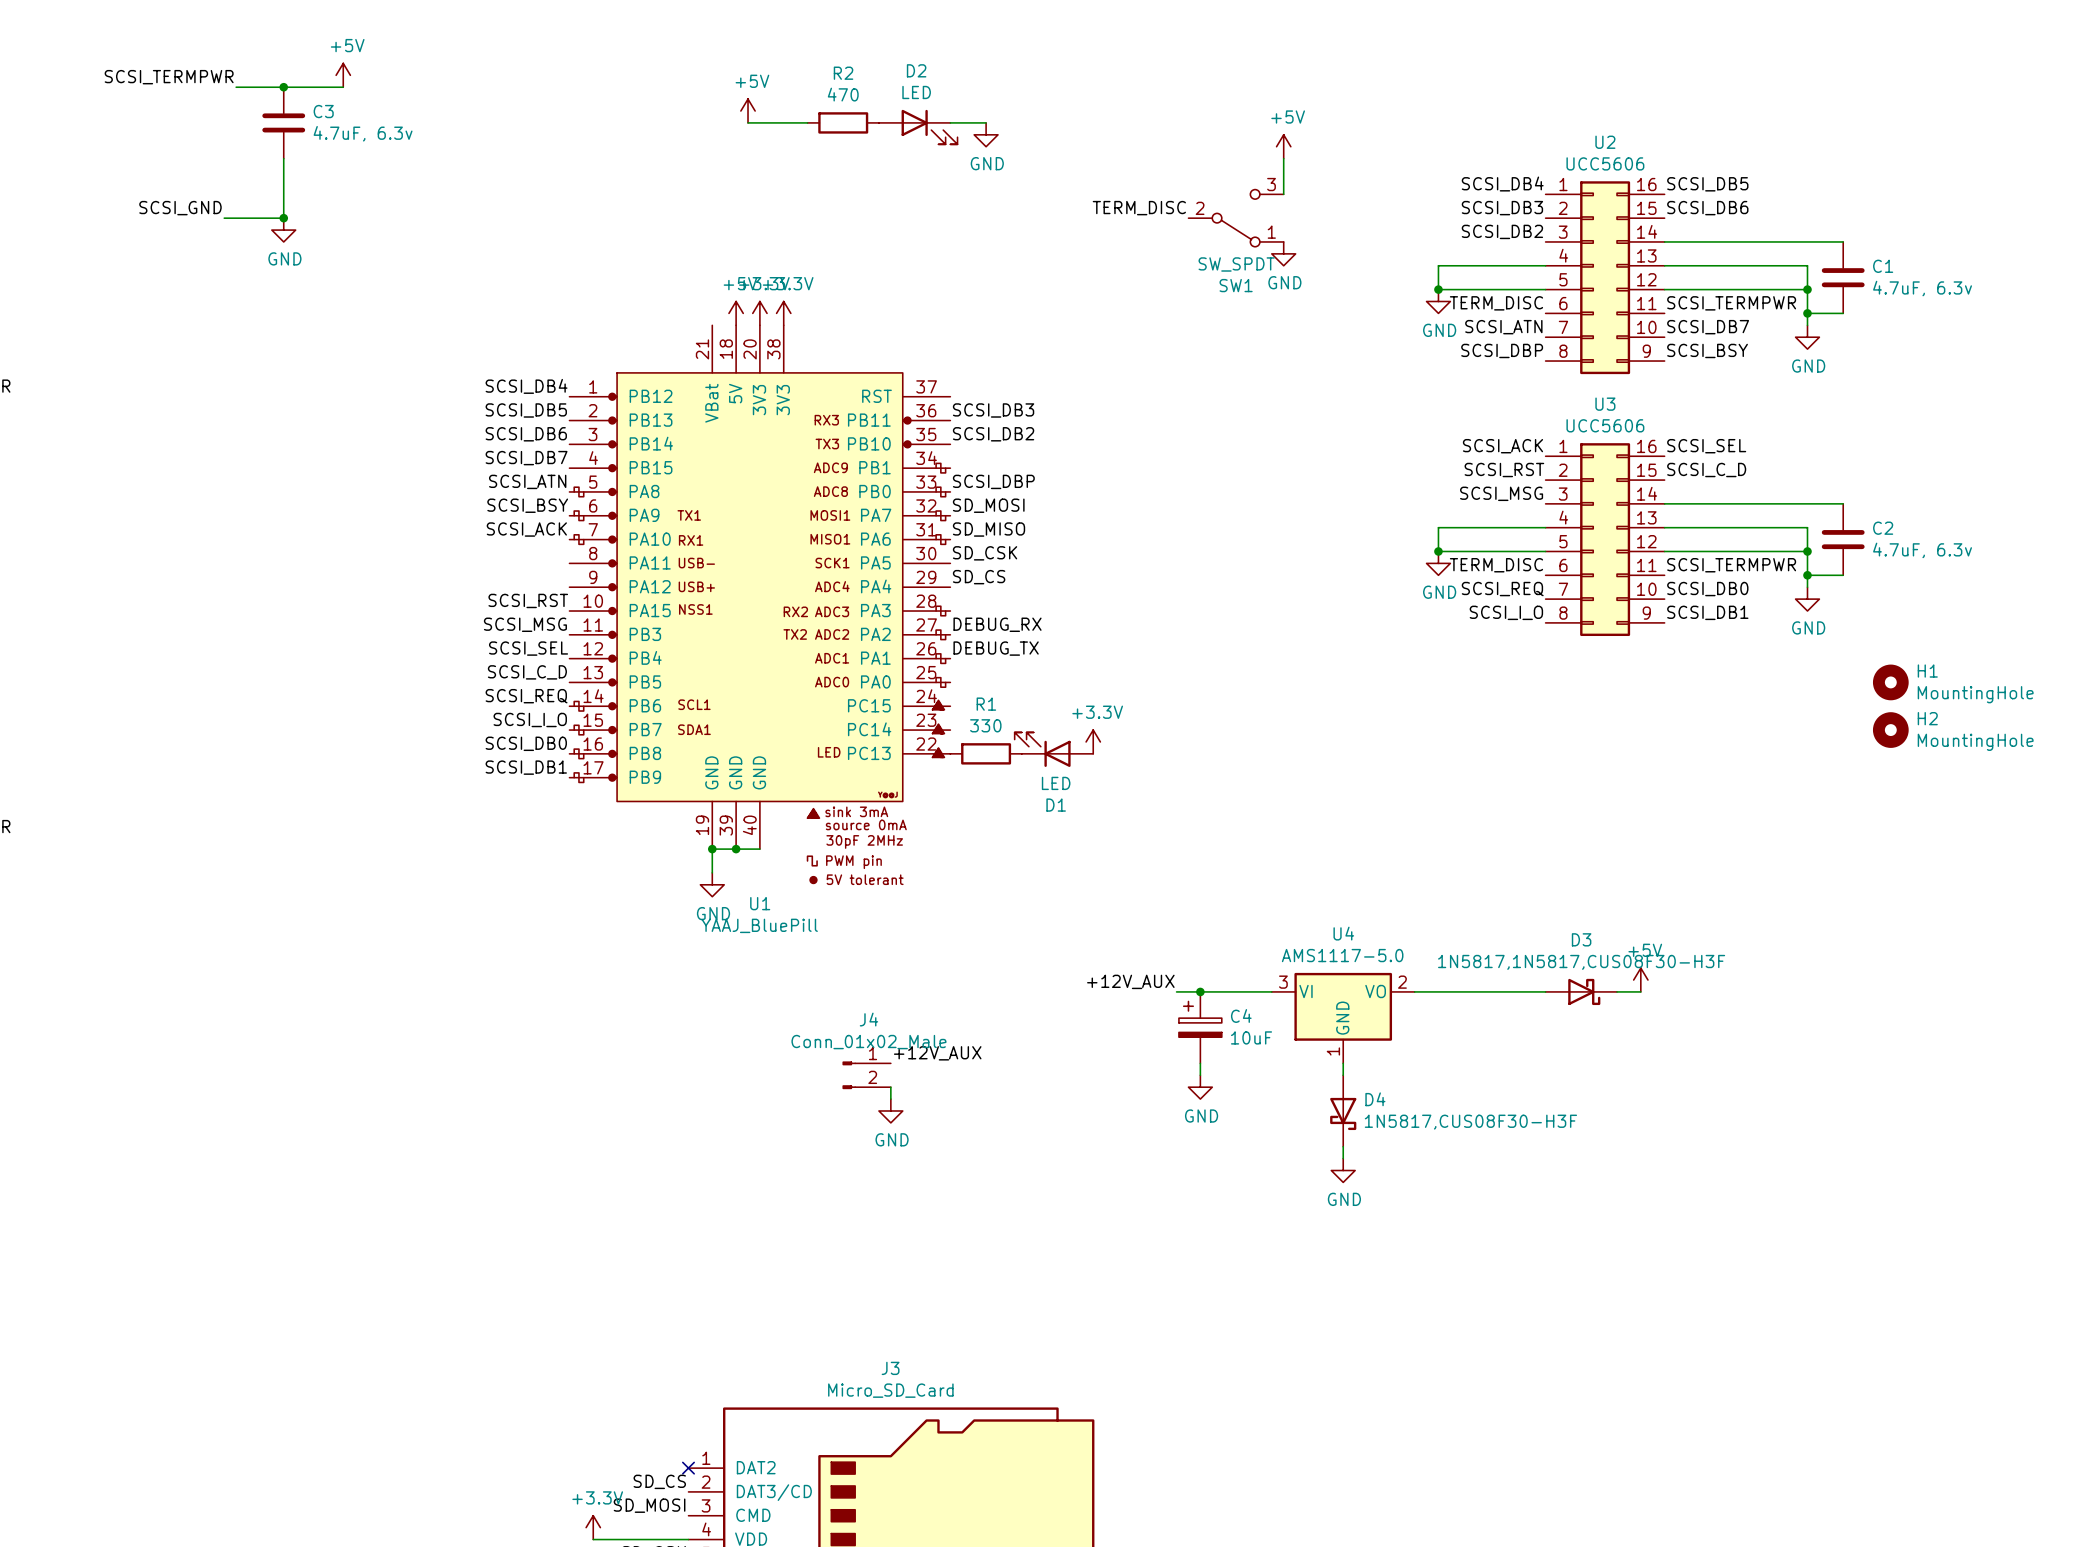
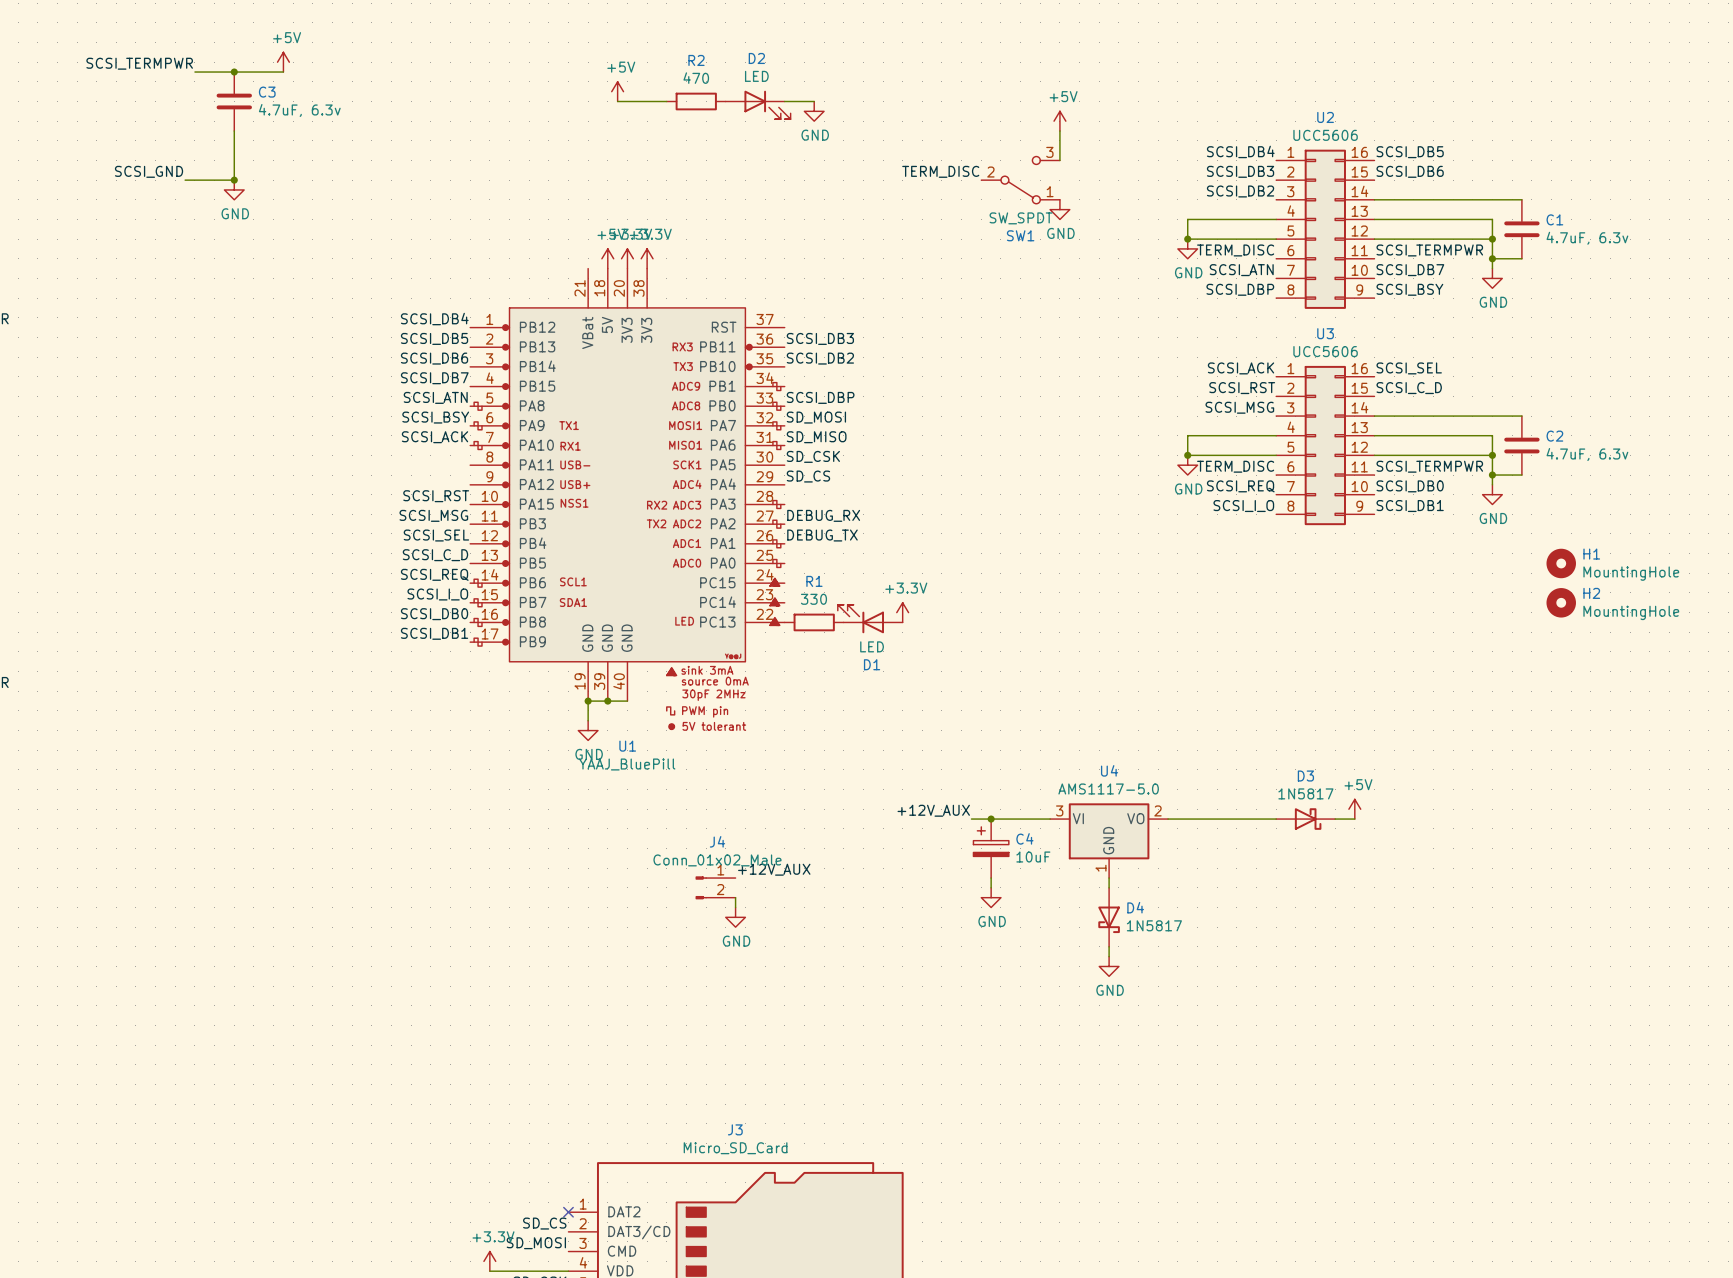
D3 value: 1N5817,1N5817,CUS08F30-H3F (1581, 962) -> 1N5817 (1305, 793)
D4 value: 1N5817,CUS08F30-H3F (1470, 1122) -> 1N5817 (1154, 925)

